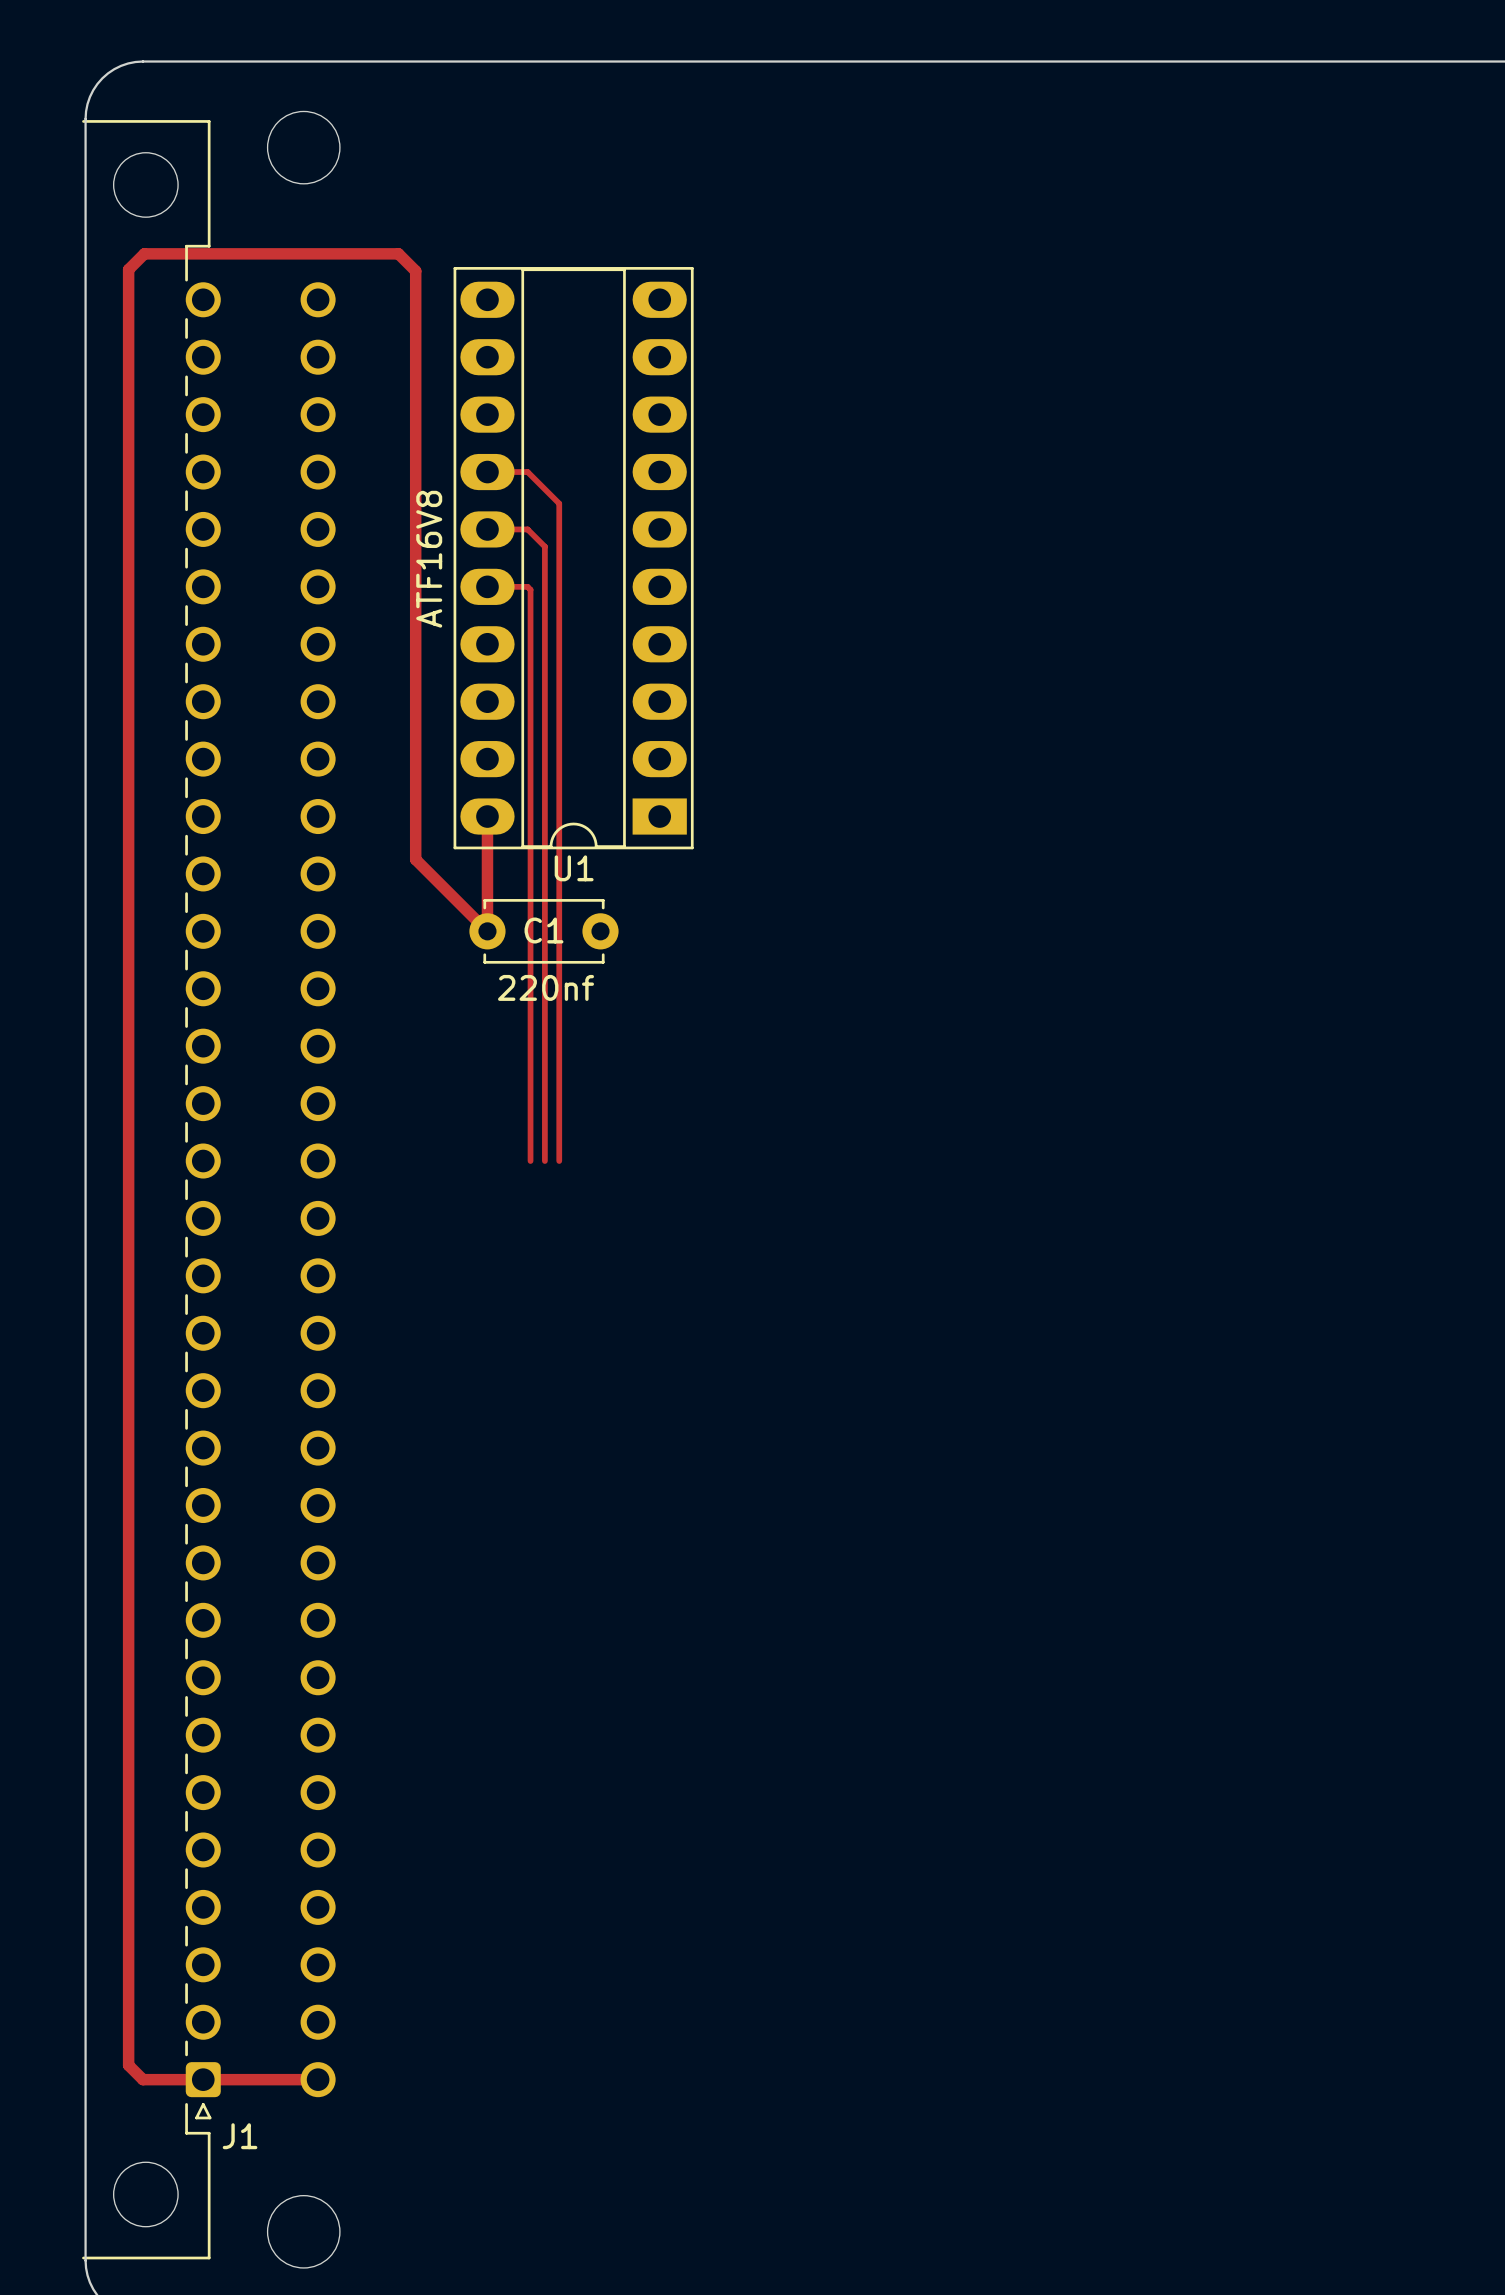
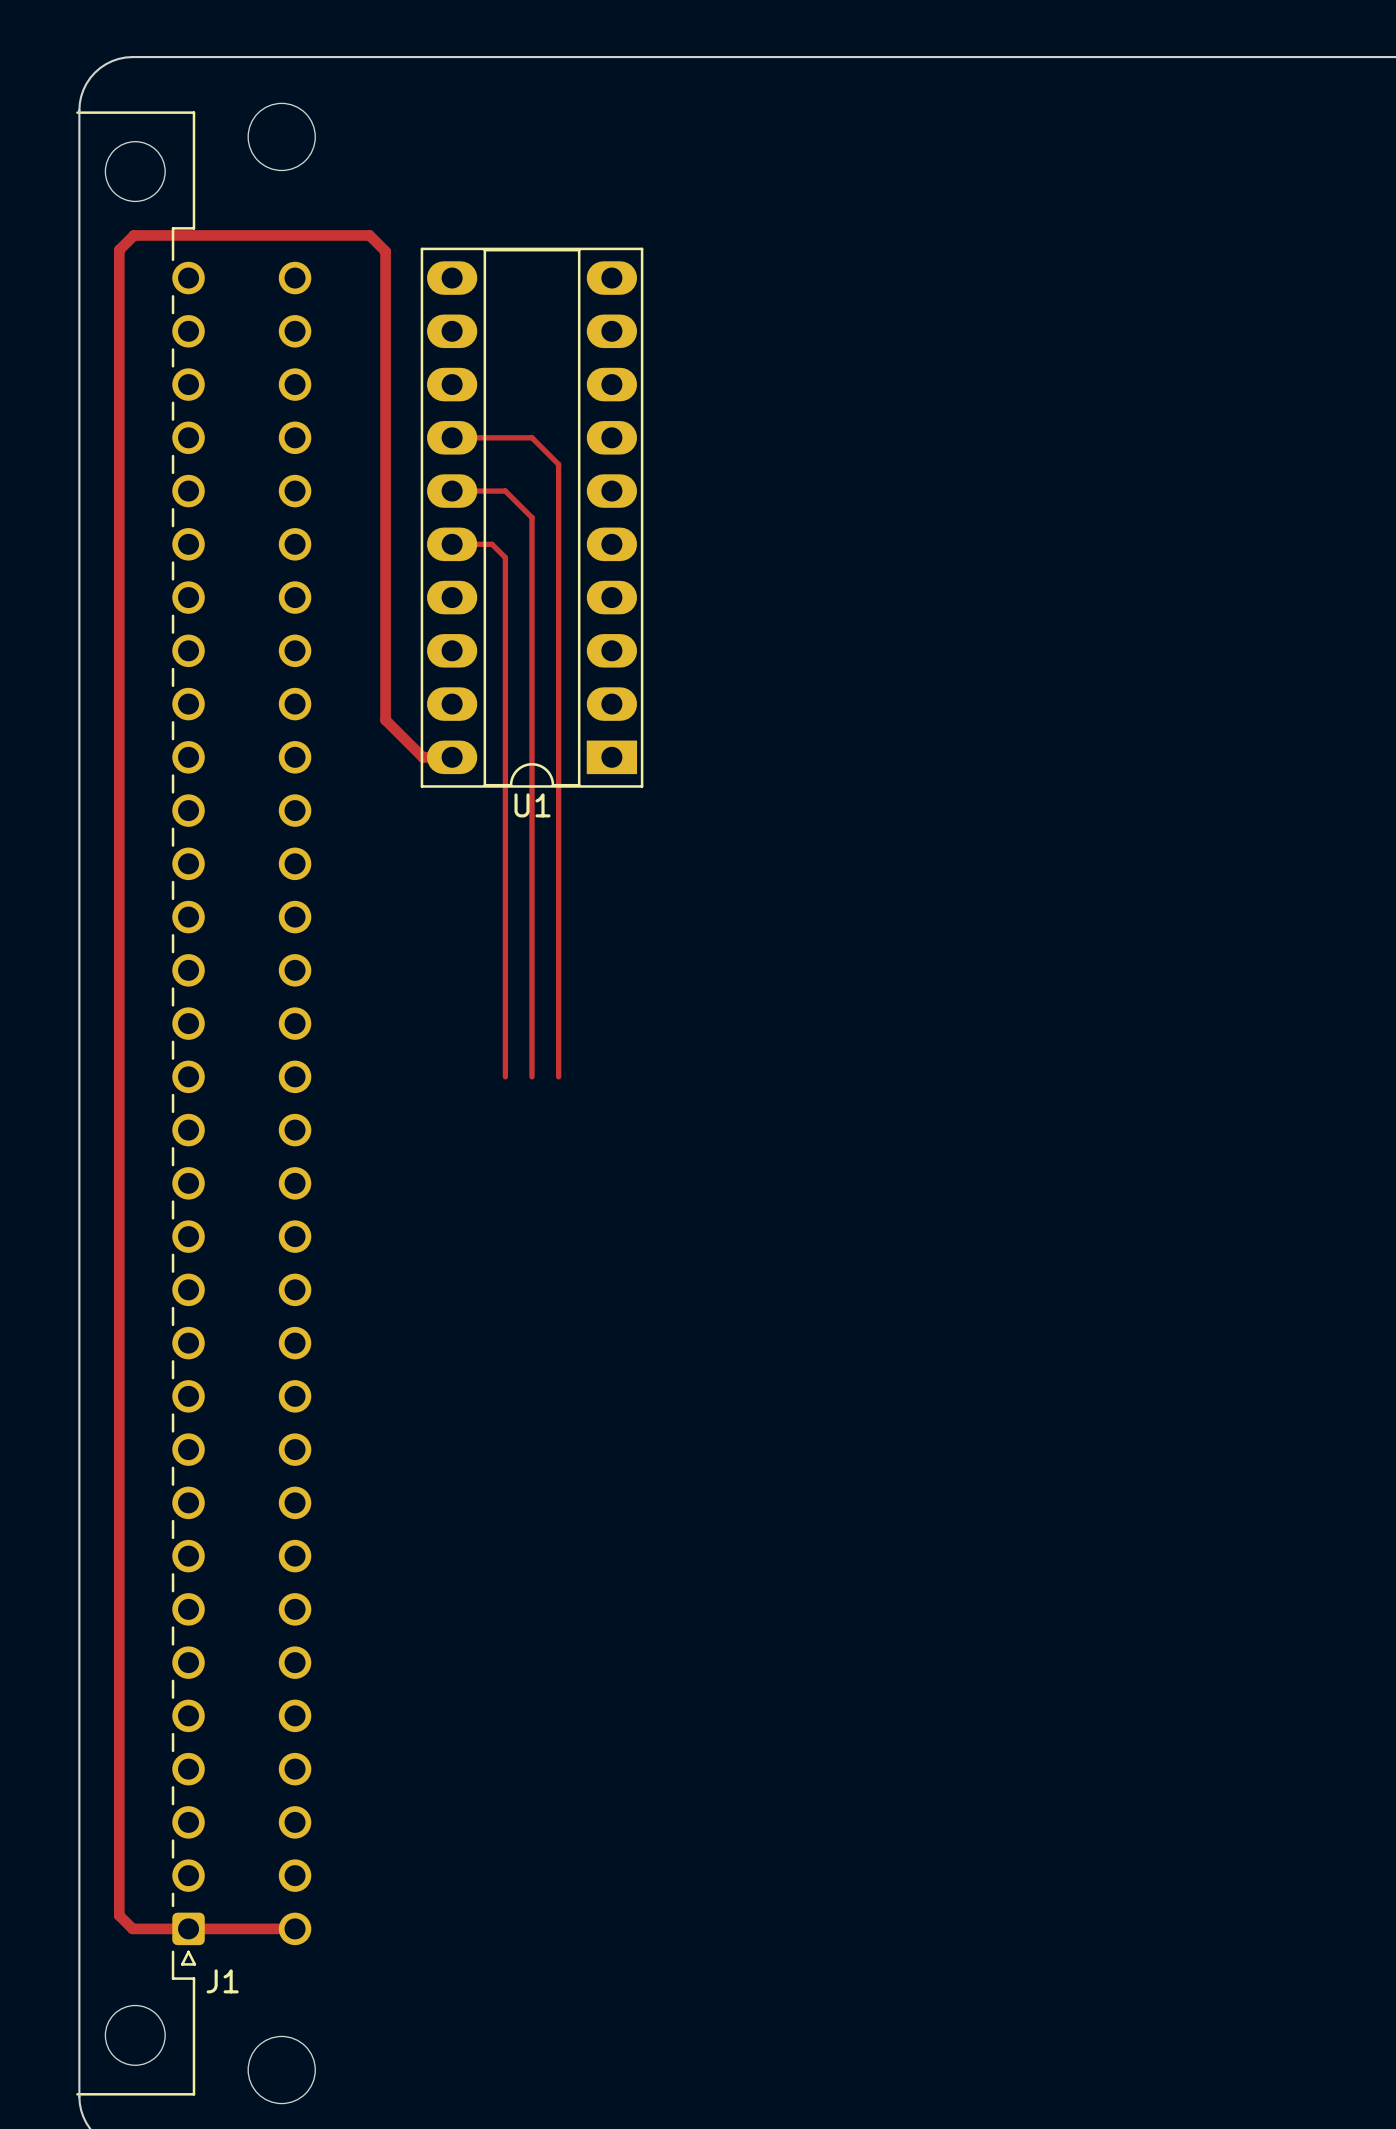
track: (527, 472) (559, 503) (559, 1161) -> (489, 437) (532, 437) (558, 464) (558, 1076)
track: (527, 529) (544, 546) (544, 601) -> (489, 544) (492, 544) (505, 557)
track: none -> (489, 491) (505, 491) (532, 517) (532, 1076)
text: ATF16V8 (429, 559) -> none
track: (527, 586) (530, 589) (530, 1161) -> none
track: (415, 776) (415, 859) (487, 931) (487, 816) -> (385, 720) (422, 757) (452, 757)
C1: (543, 931) -> none
text: 220nf (546, 987) -> none

